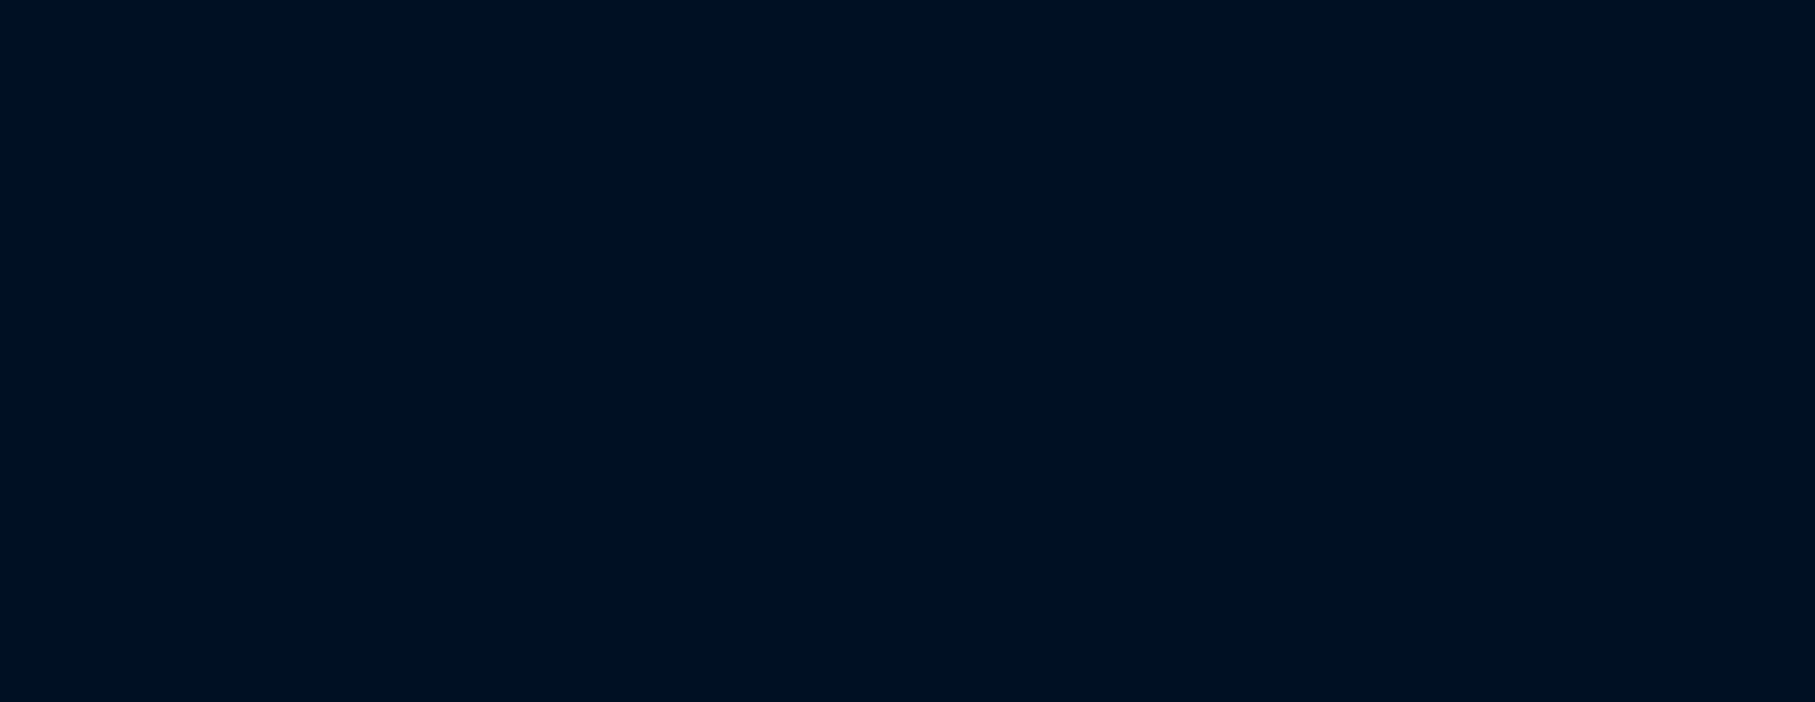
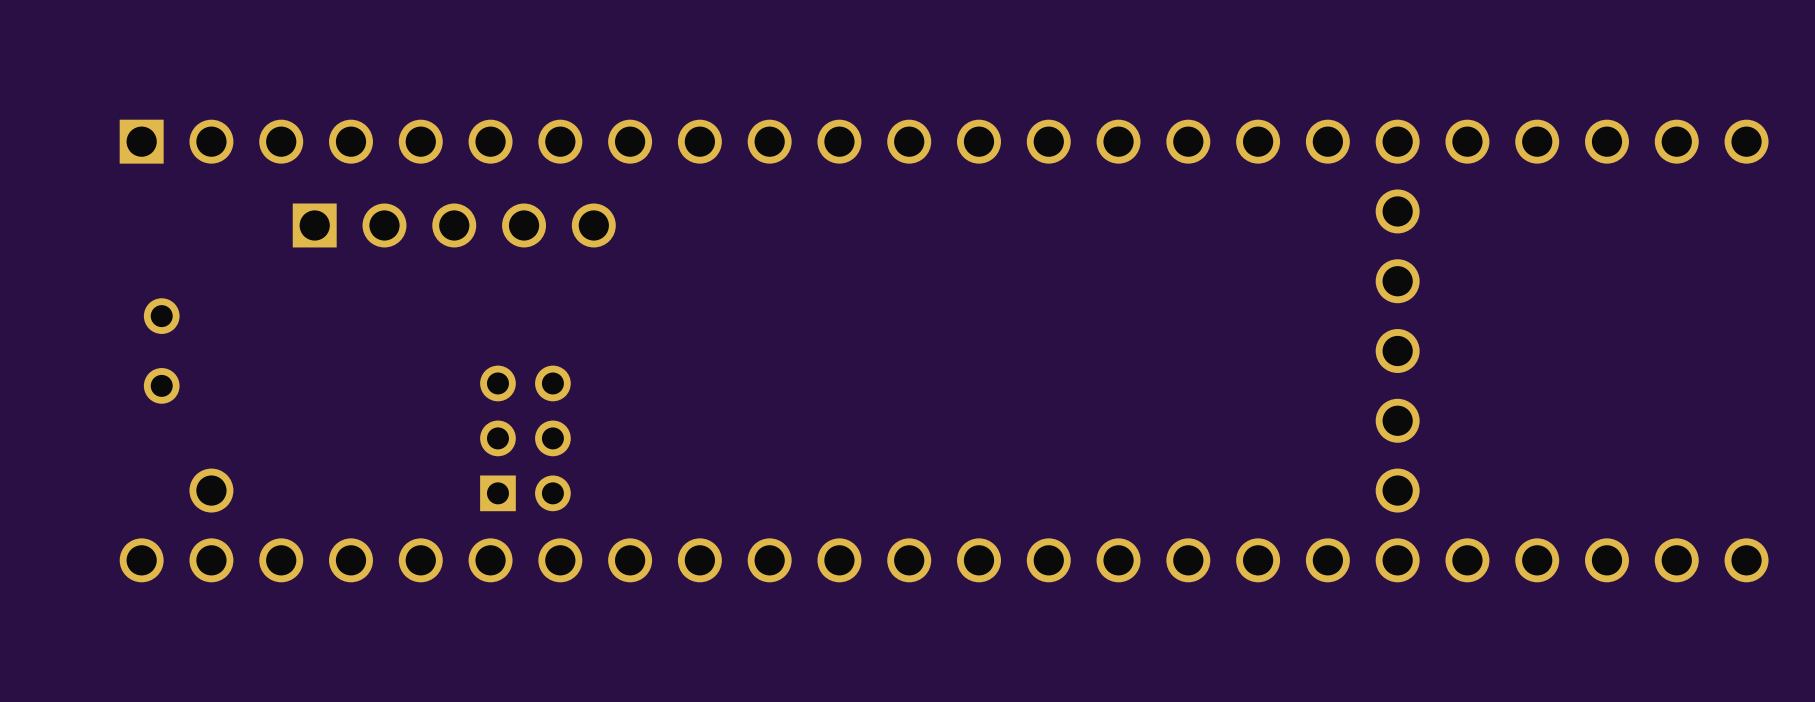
part: none -> (944, 351)

